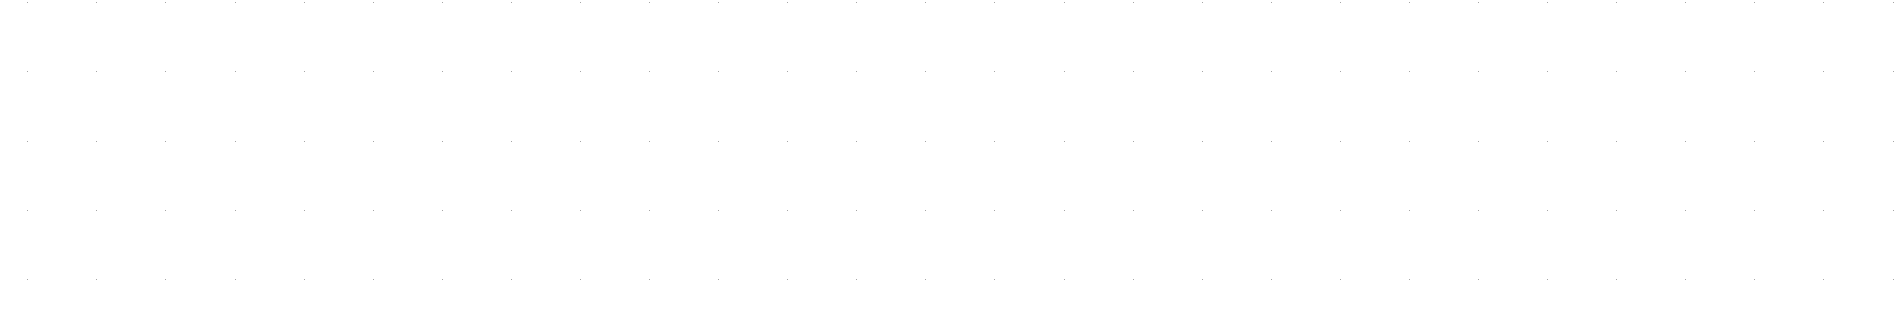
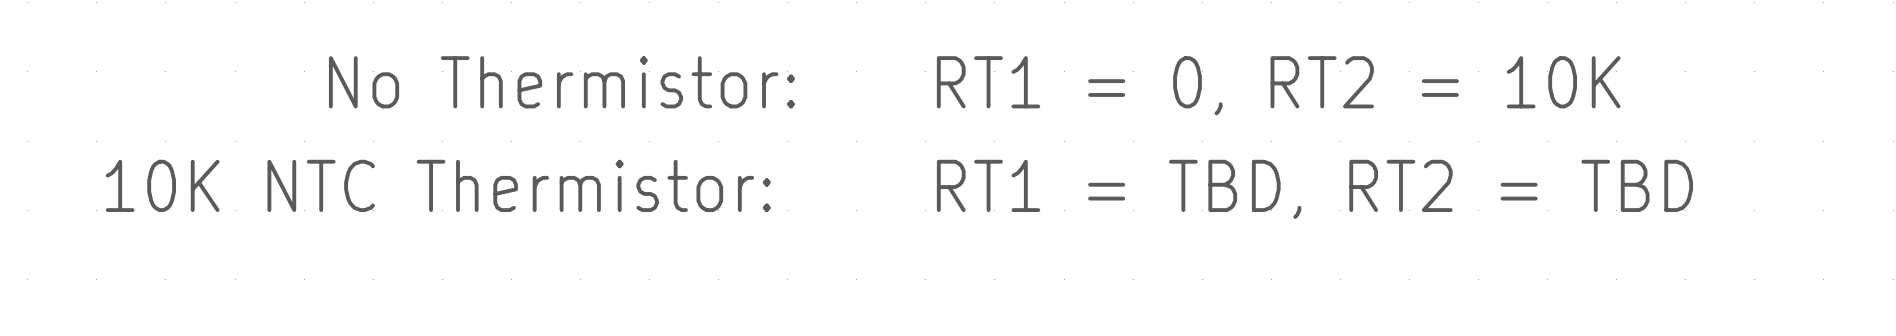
text: none -> No Thermistor: (561, 82)
text: none -> RT1 = 0, RT2 = 10K (1278, 85)
text: none -> 10K NTC Thermistor: (438, 185)
text: none -> RT1 = TBD, RT2 = TBD (1314, 189)

